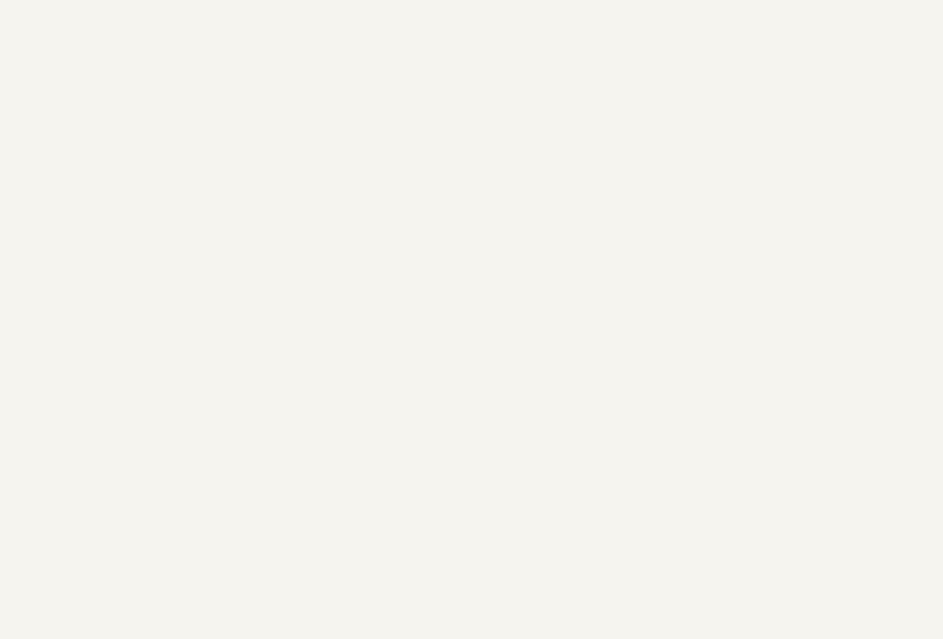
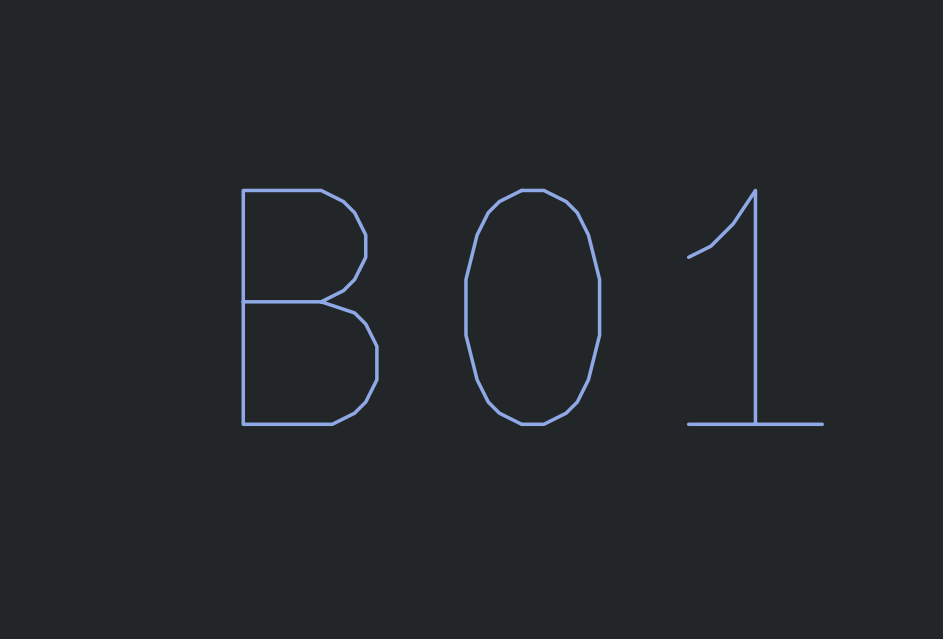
text: none -> B01 (532, 307)

